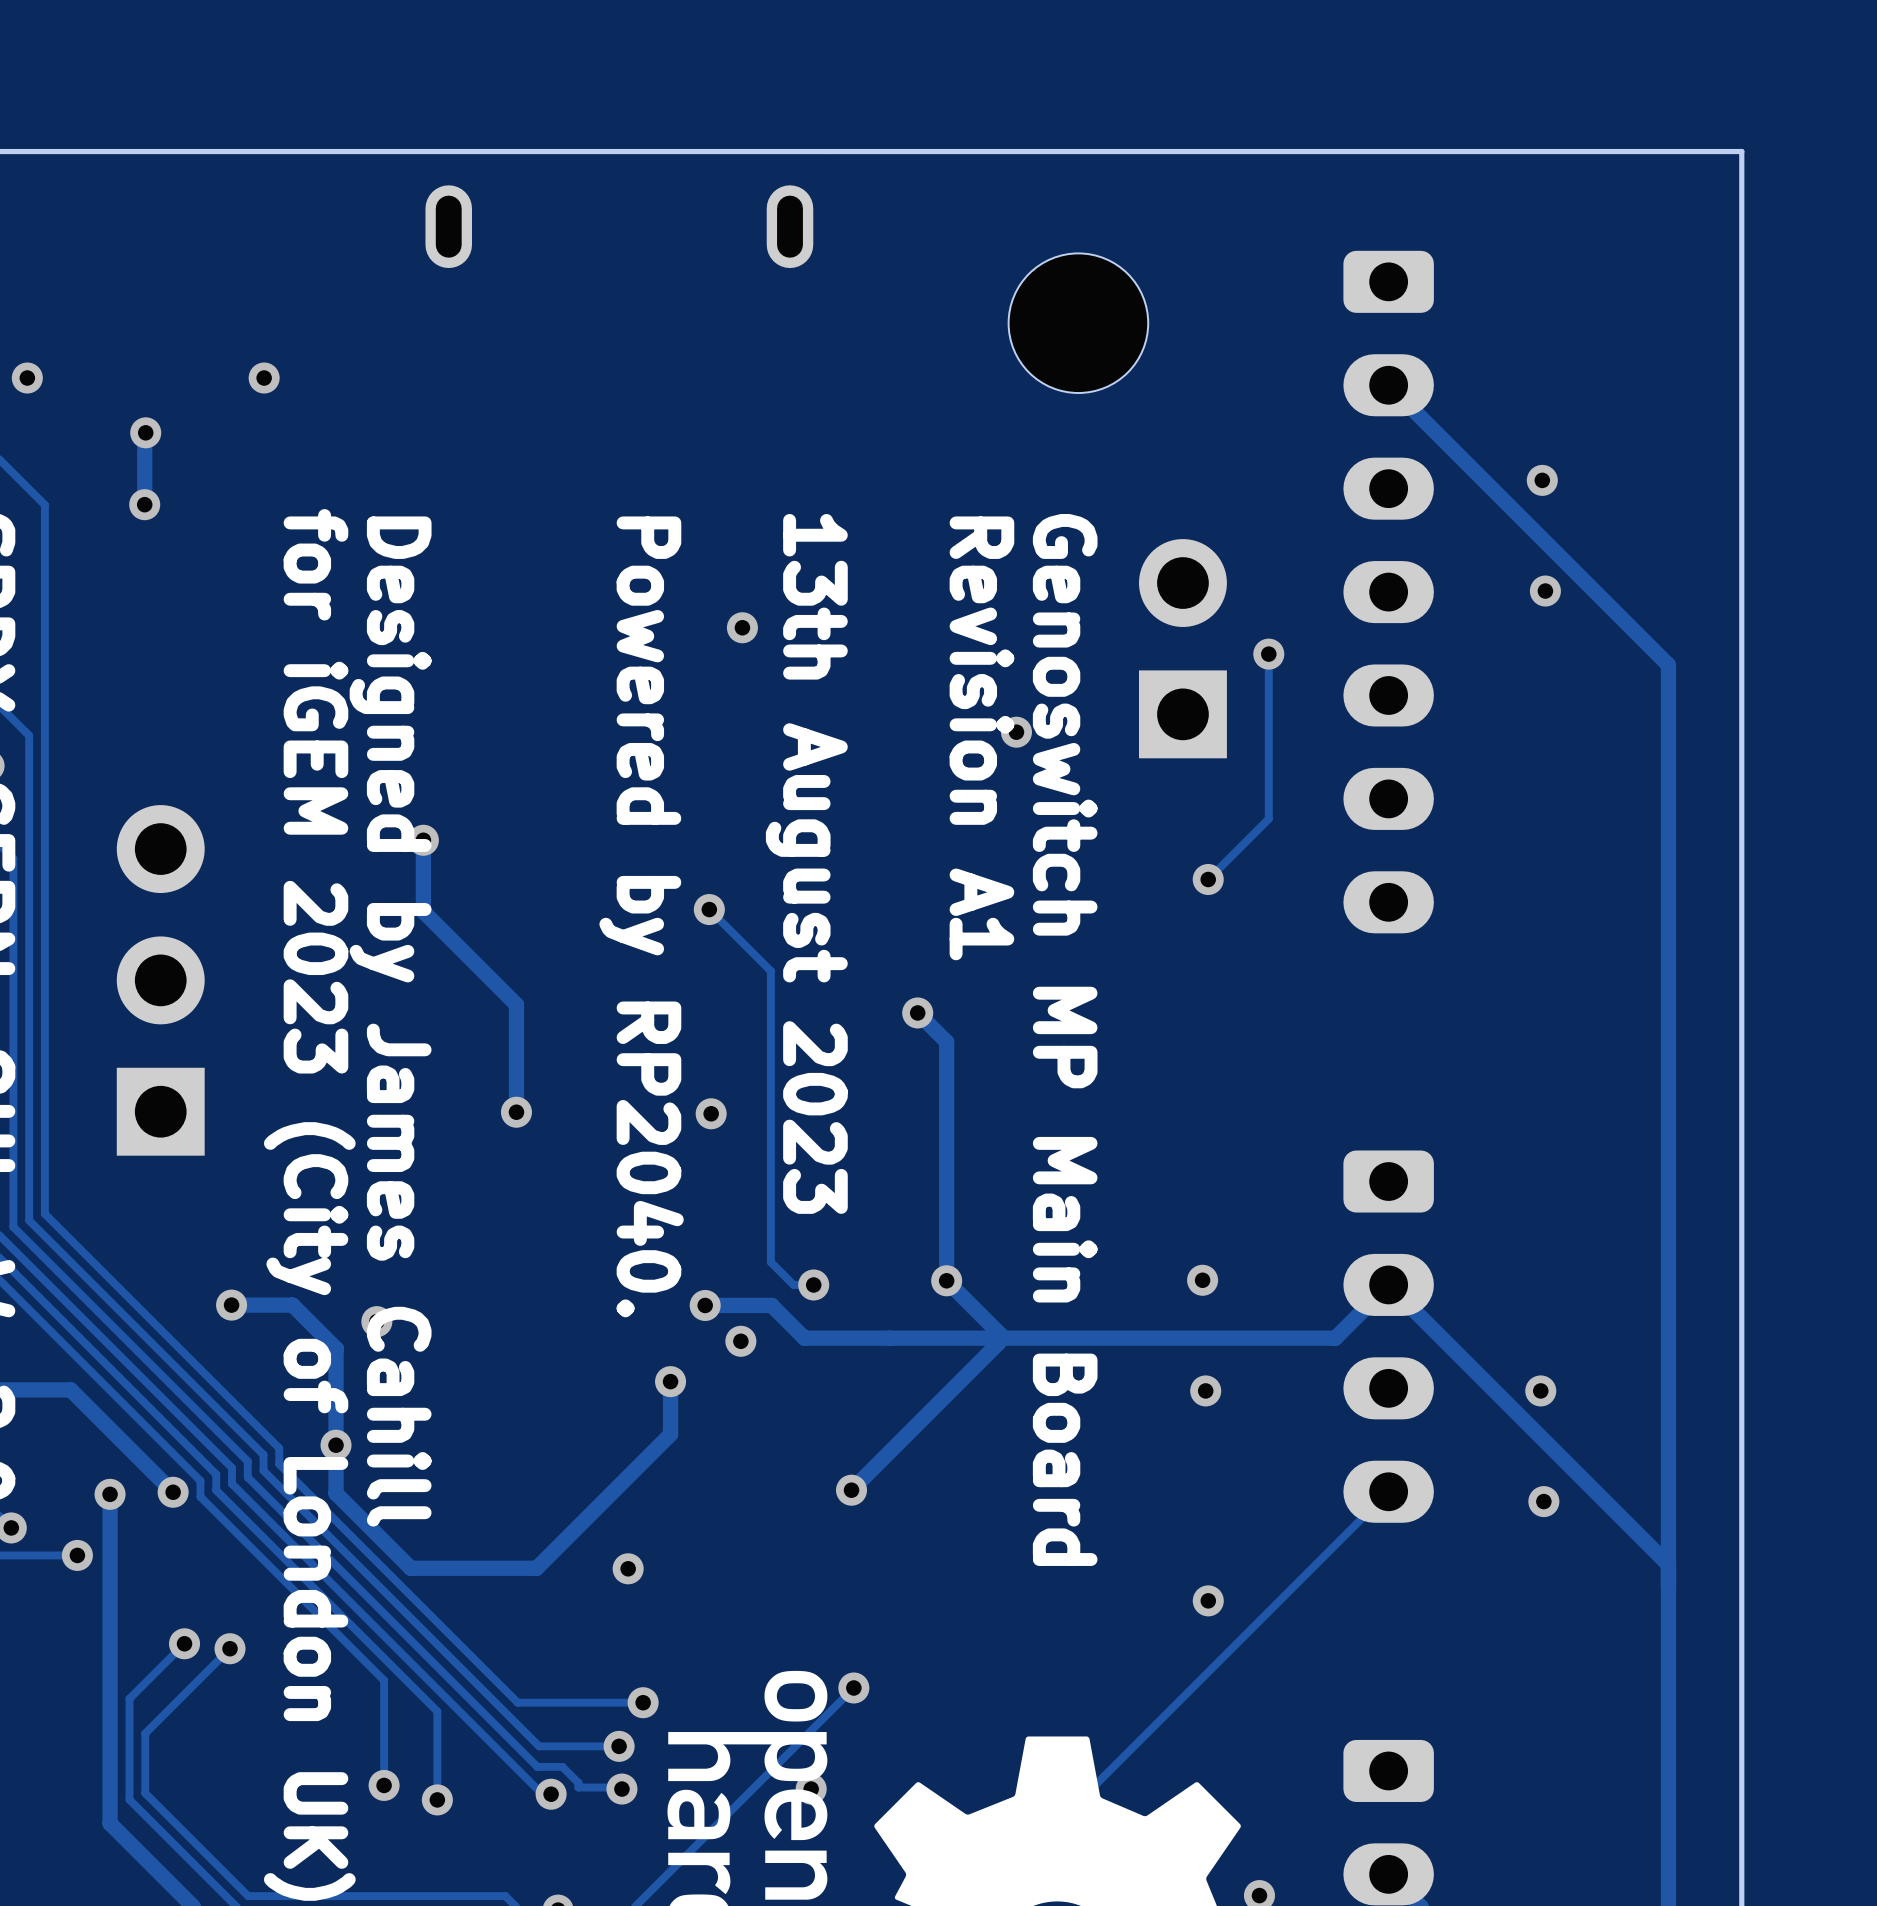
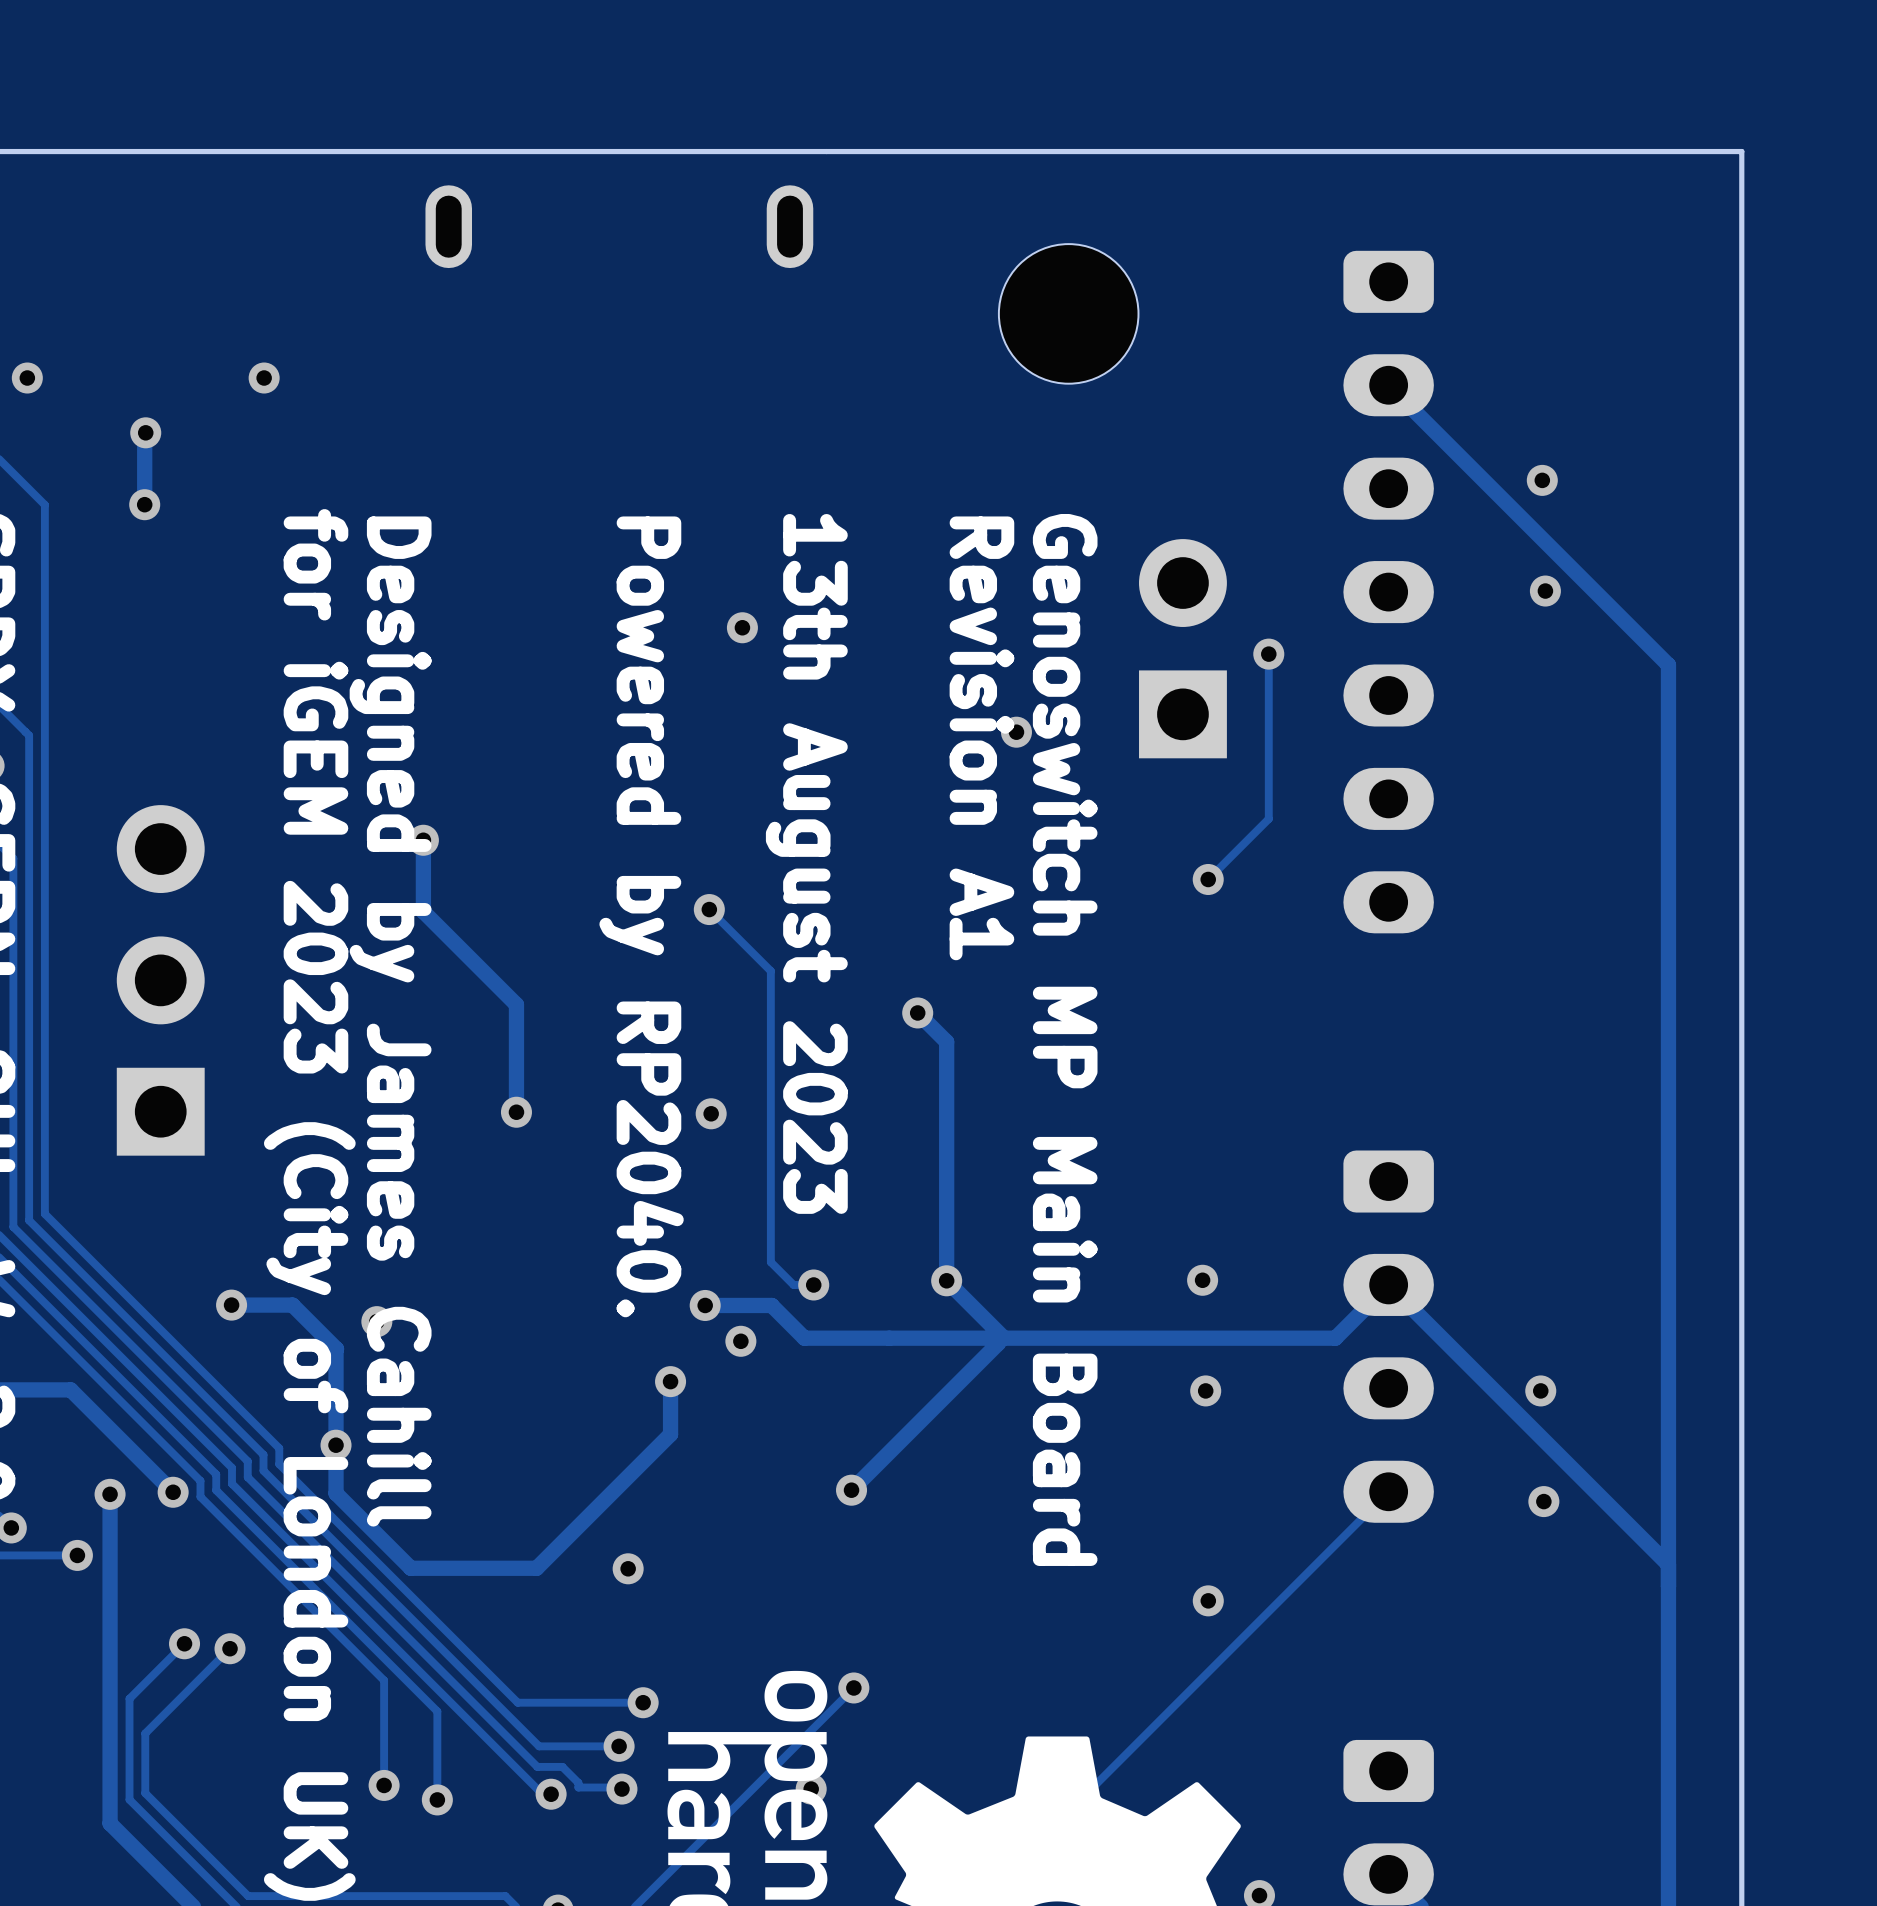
part position: (1078, 323) -> (1068, 313)

